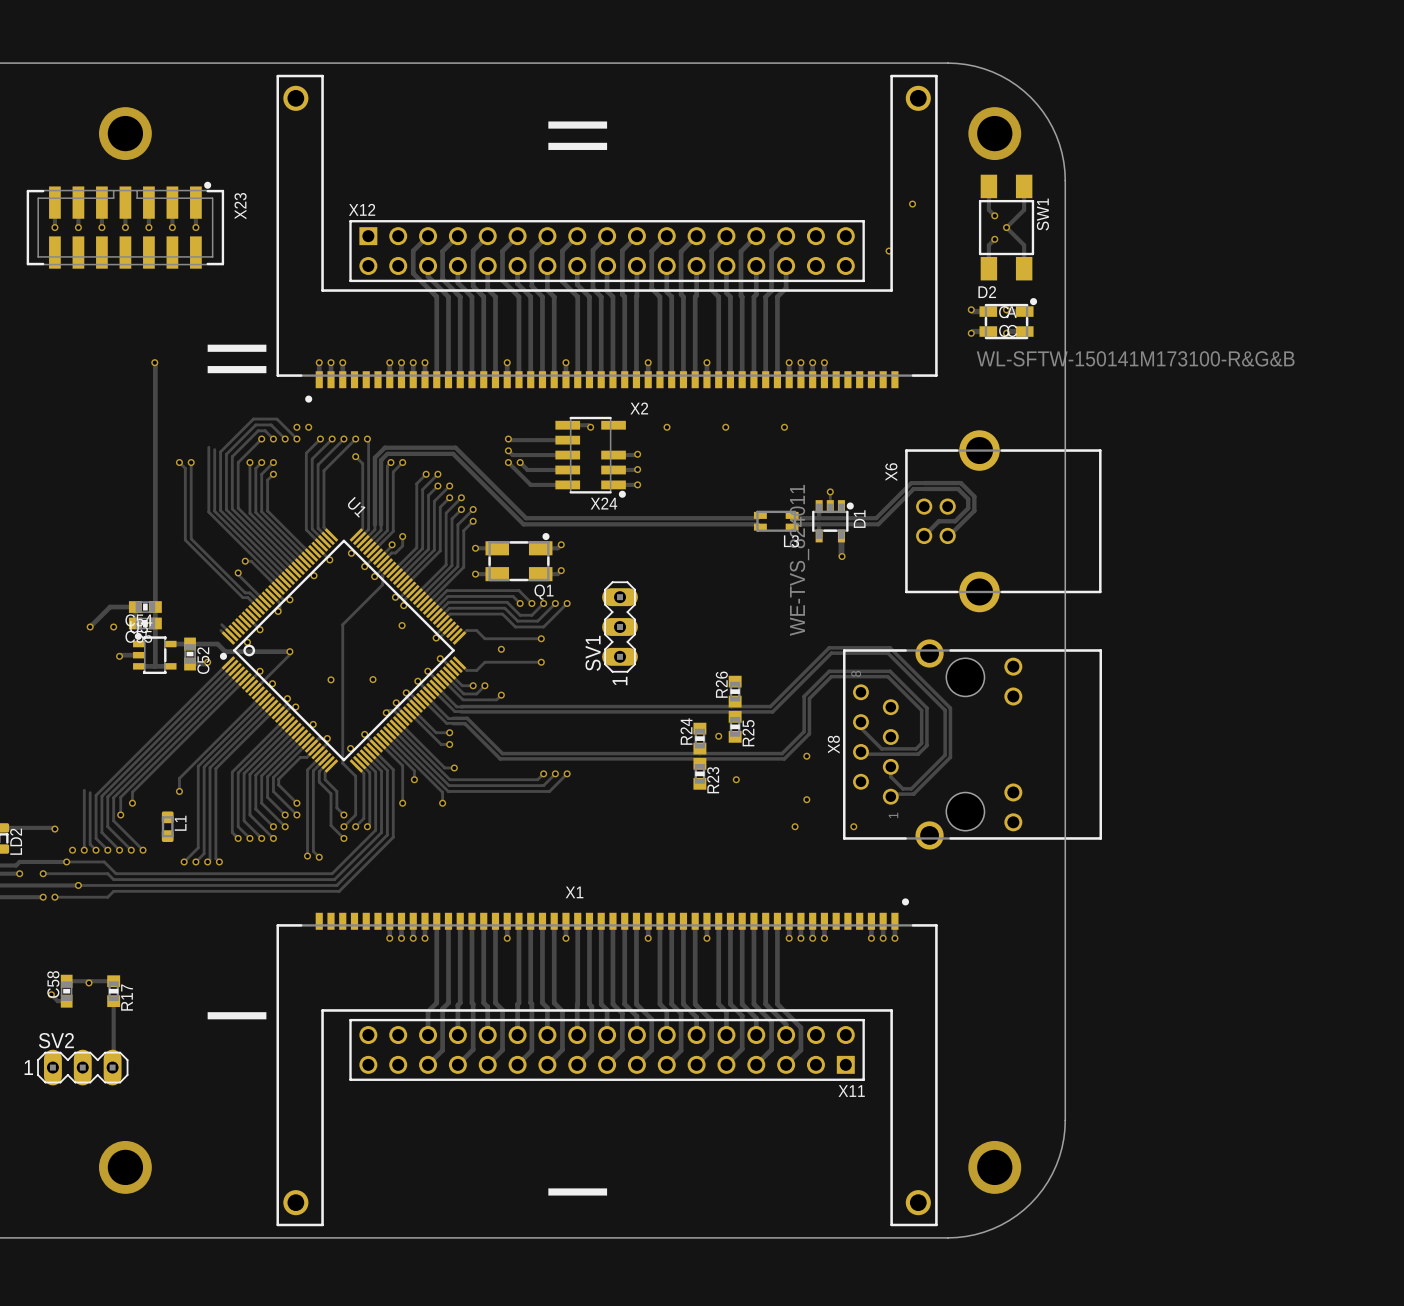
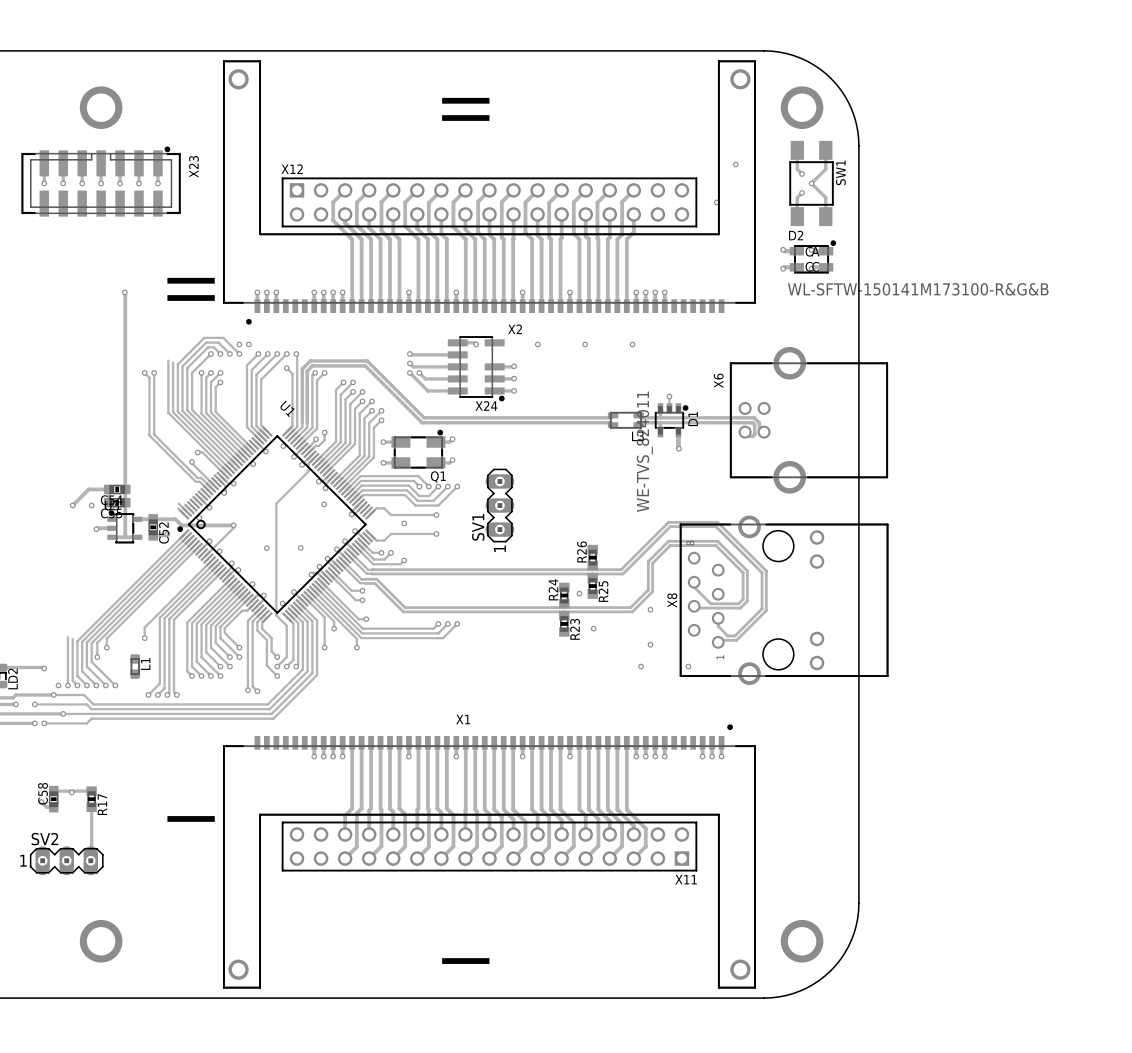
track: (876, 518) (911, 483) (960, 483) (974, 496) (974, 510) (947, 535) -> (706, 417) (754, 417) (759, 423) (759, 432) (764, 432)
track: (878, 524) (913, 488) (958, 488) (968, 499) (968, 508) (955, 521) (938, 521) (924, 535) -> (708, 422) (752, 422) (754, 425) (754, 434) (752, 436) (749, 436) (745, 432)

